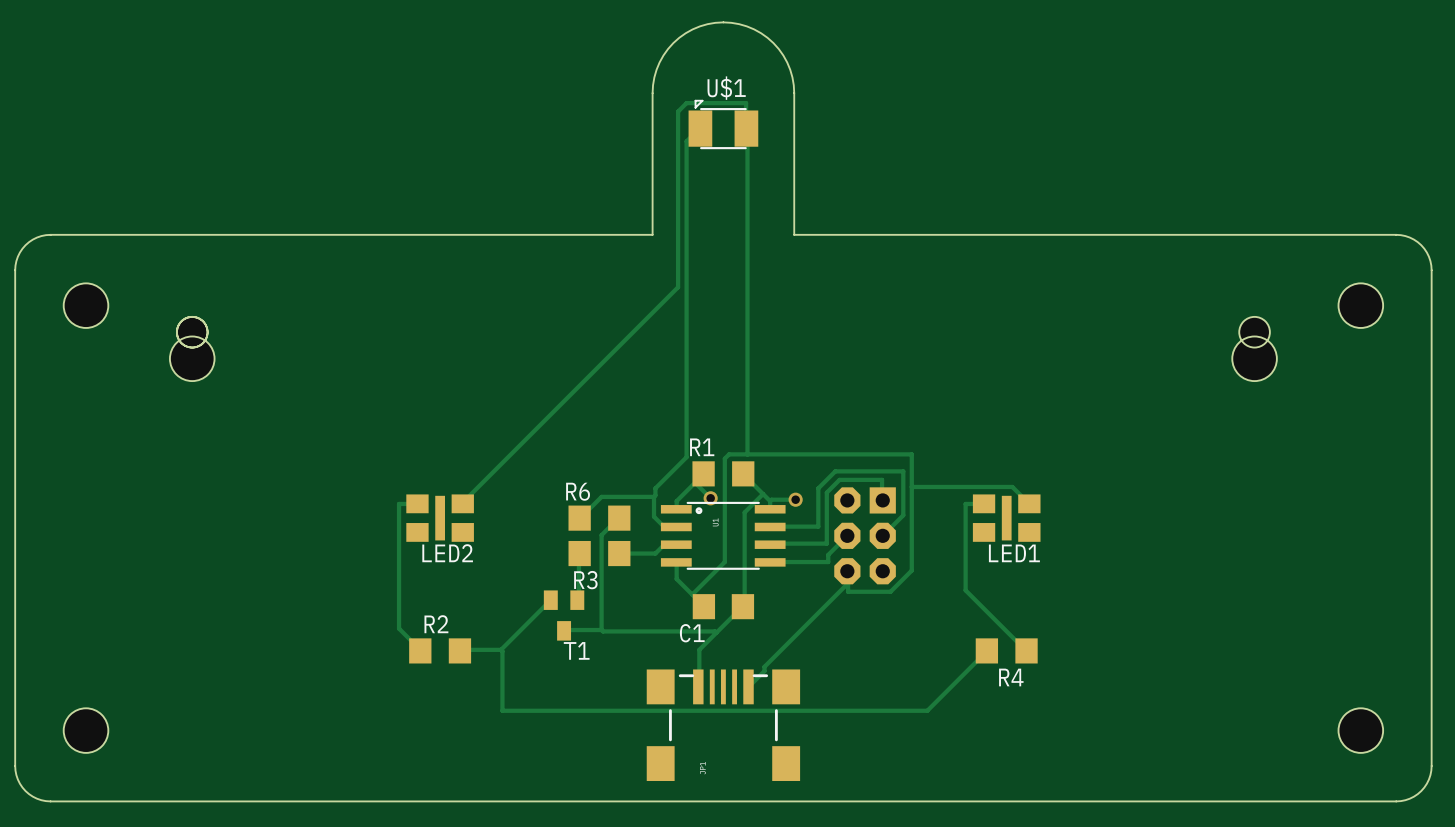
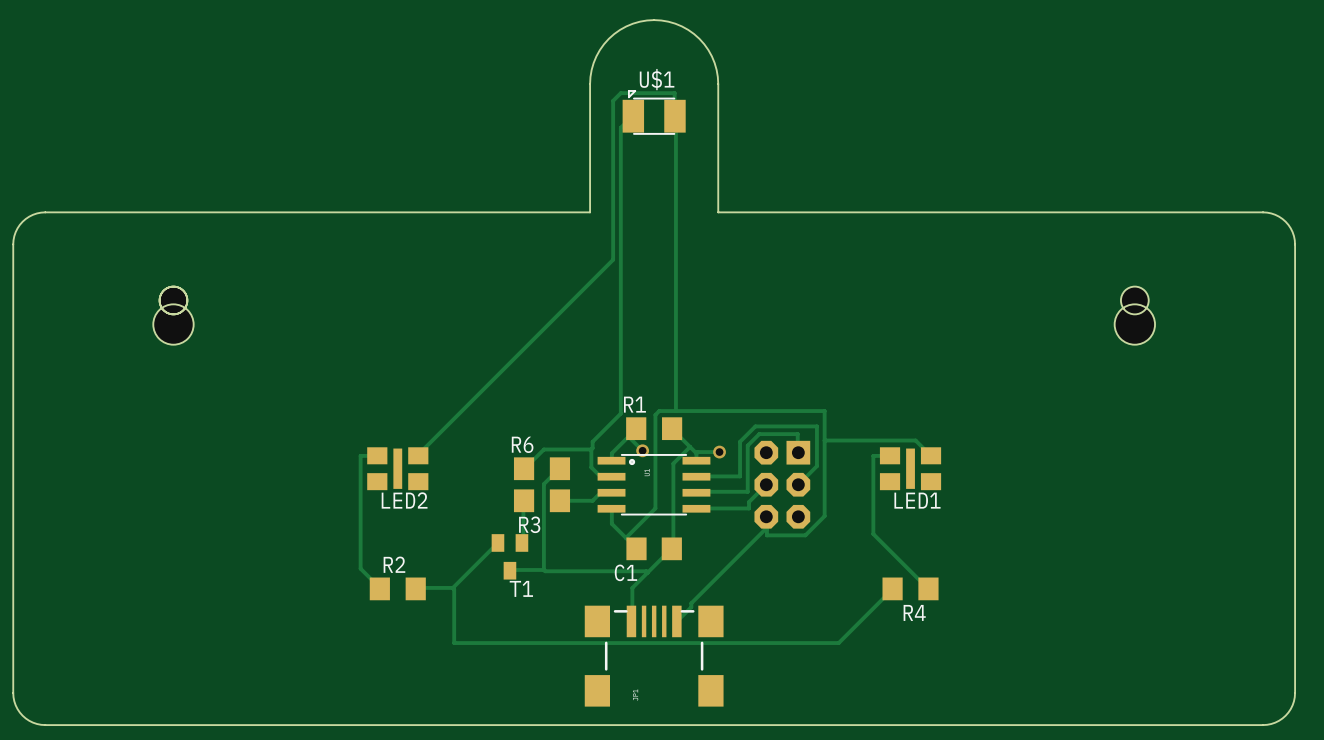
hole: (86, 305) -> none
hole: (1360, 305) -> none
hole: (86, 730) -> none
hole: (1360, 730) -> none

